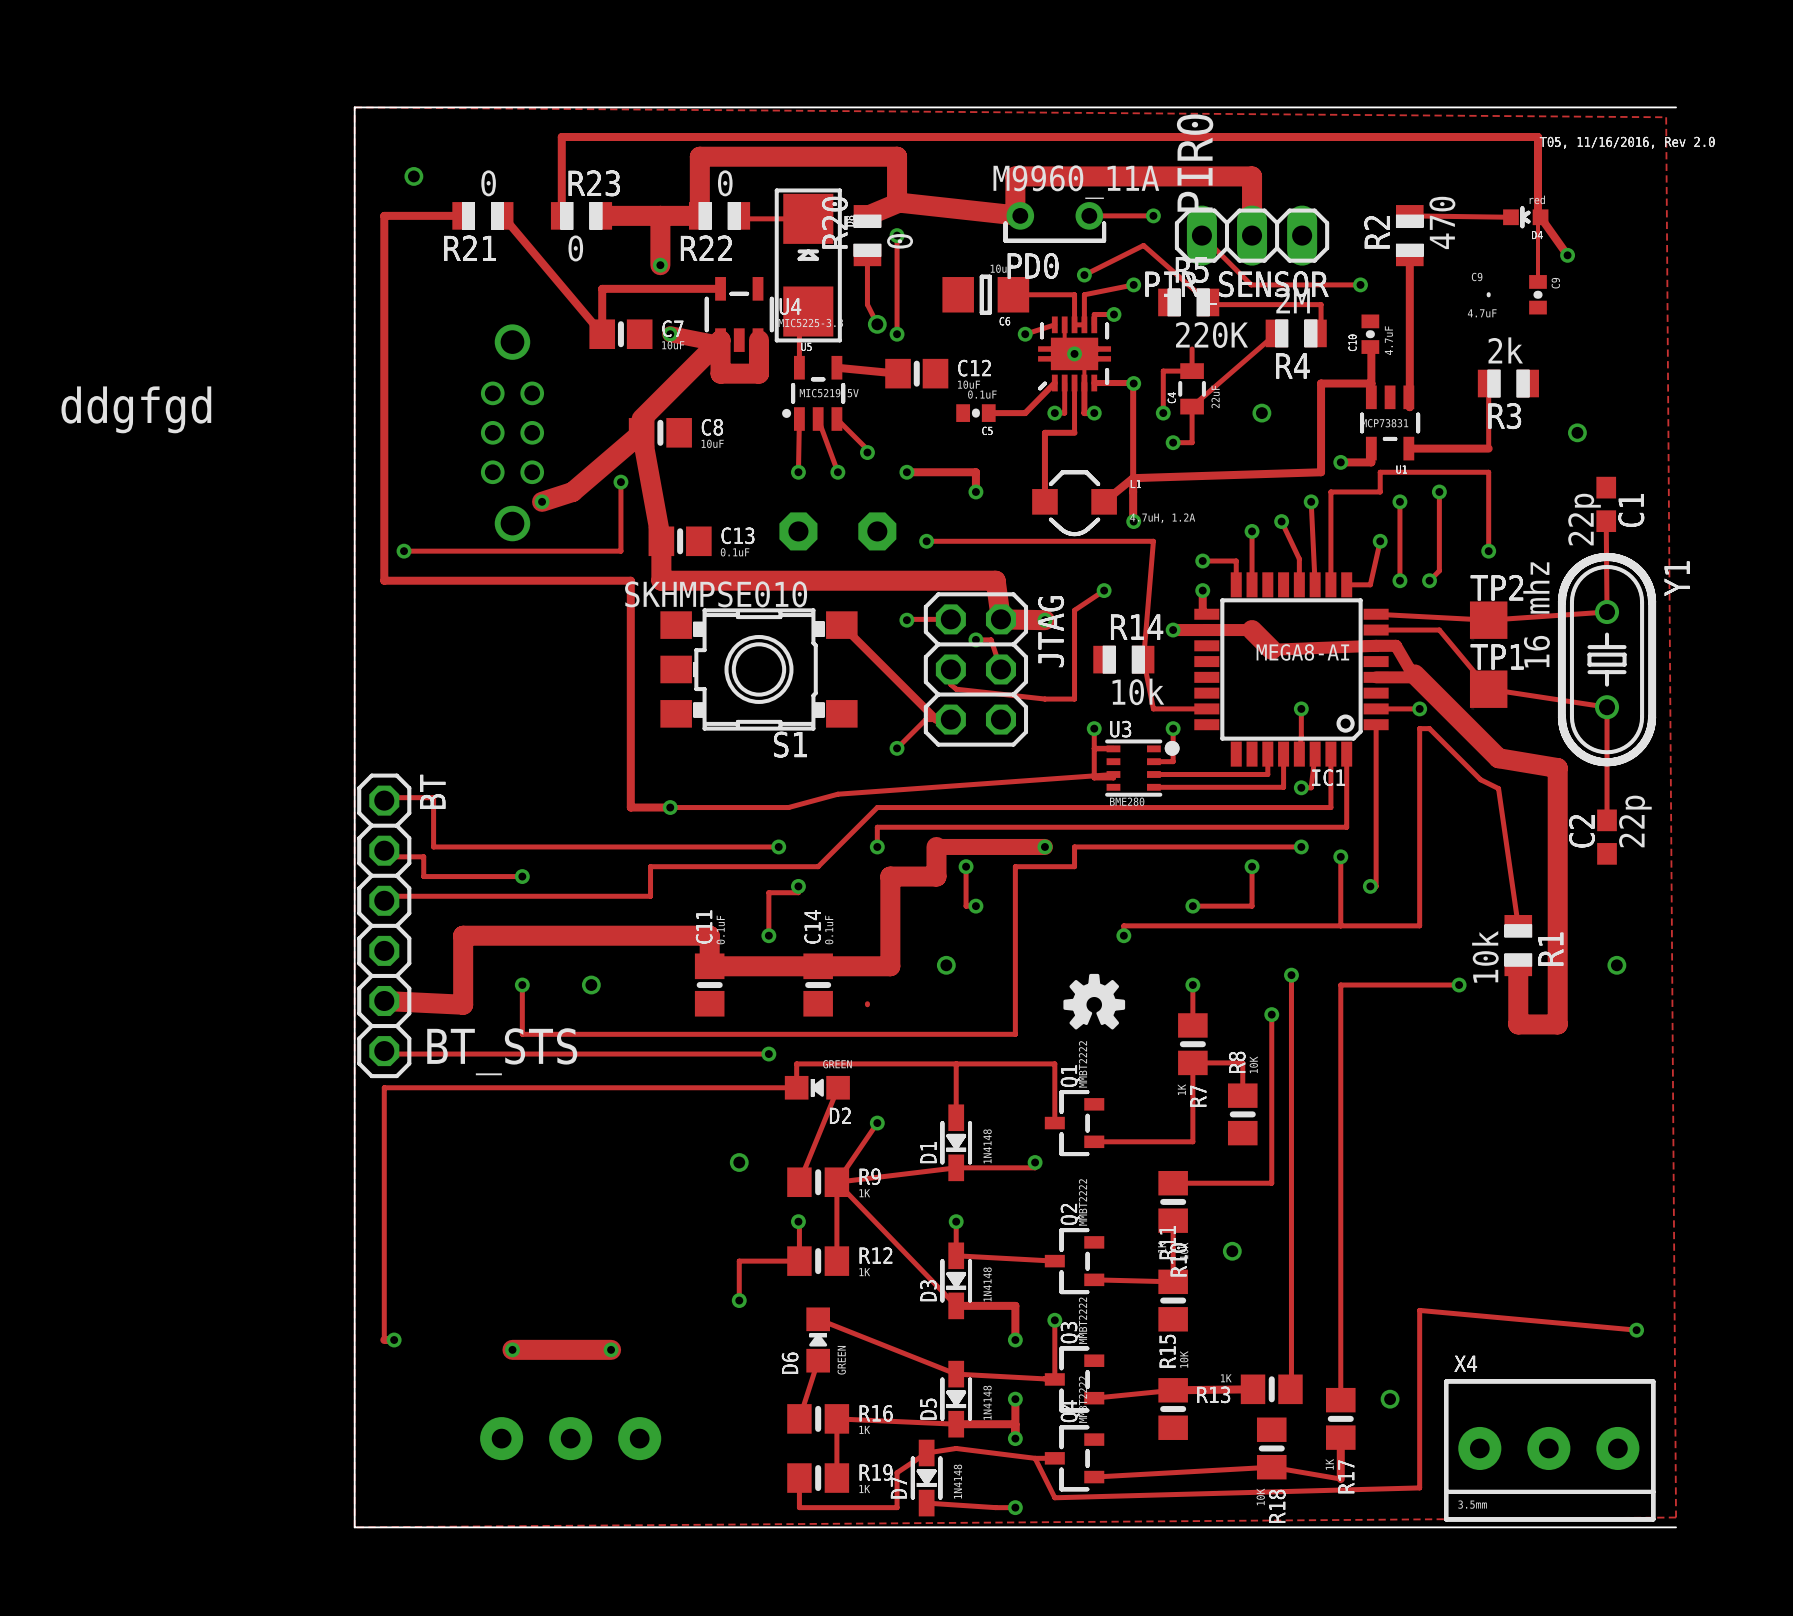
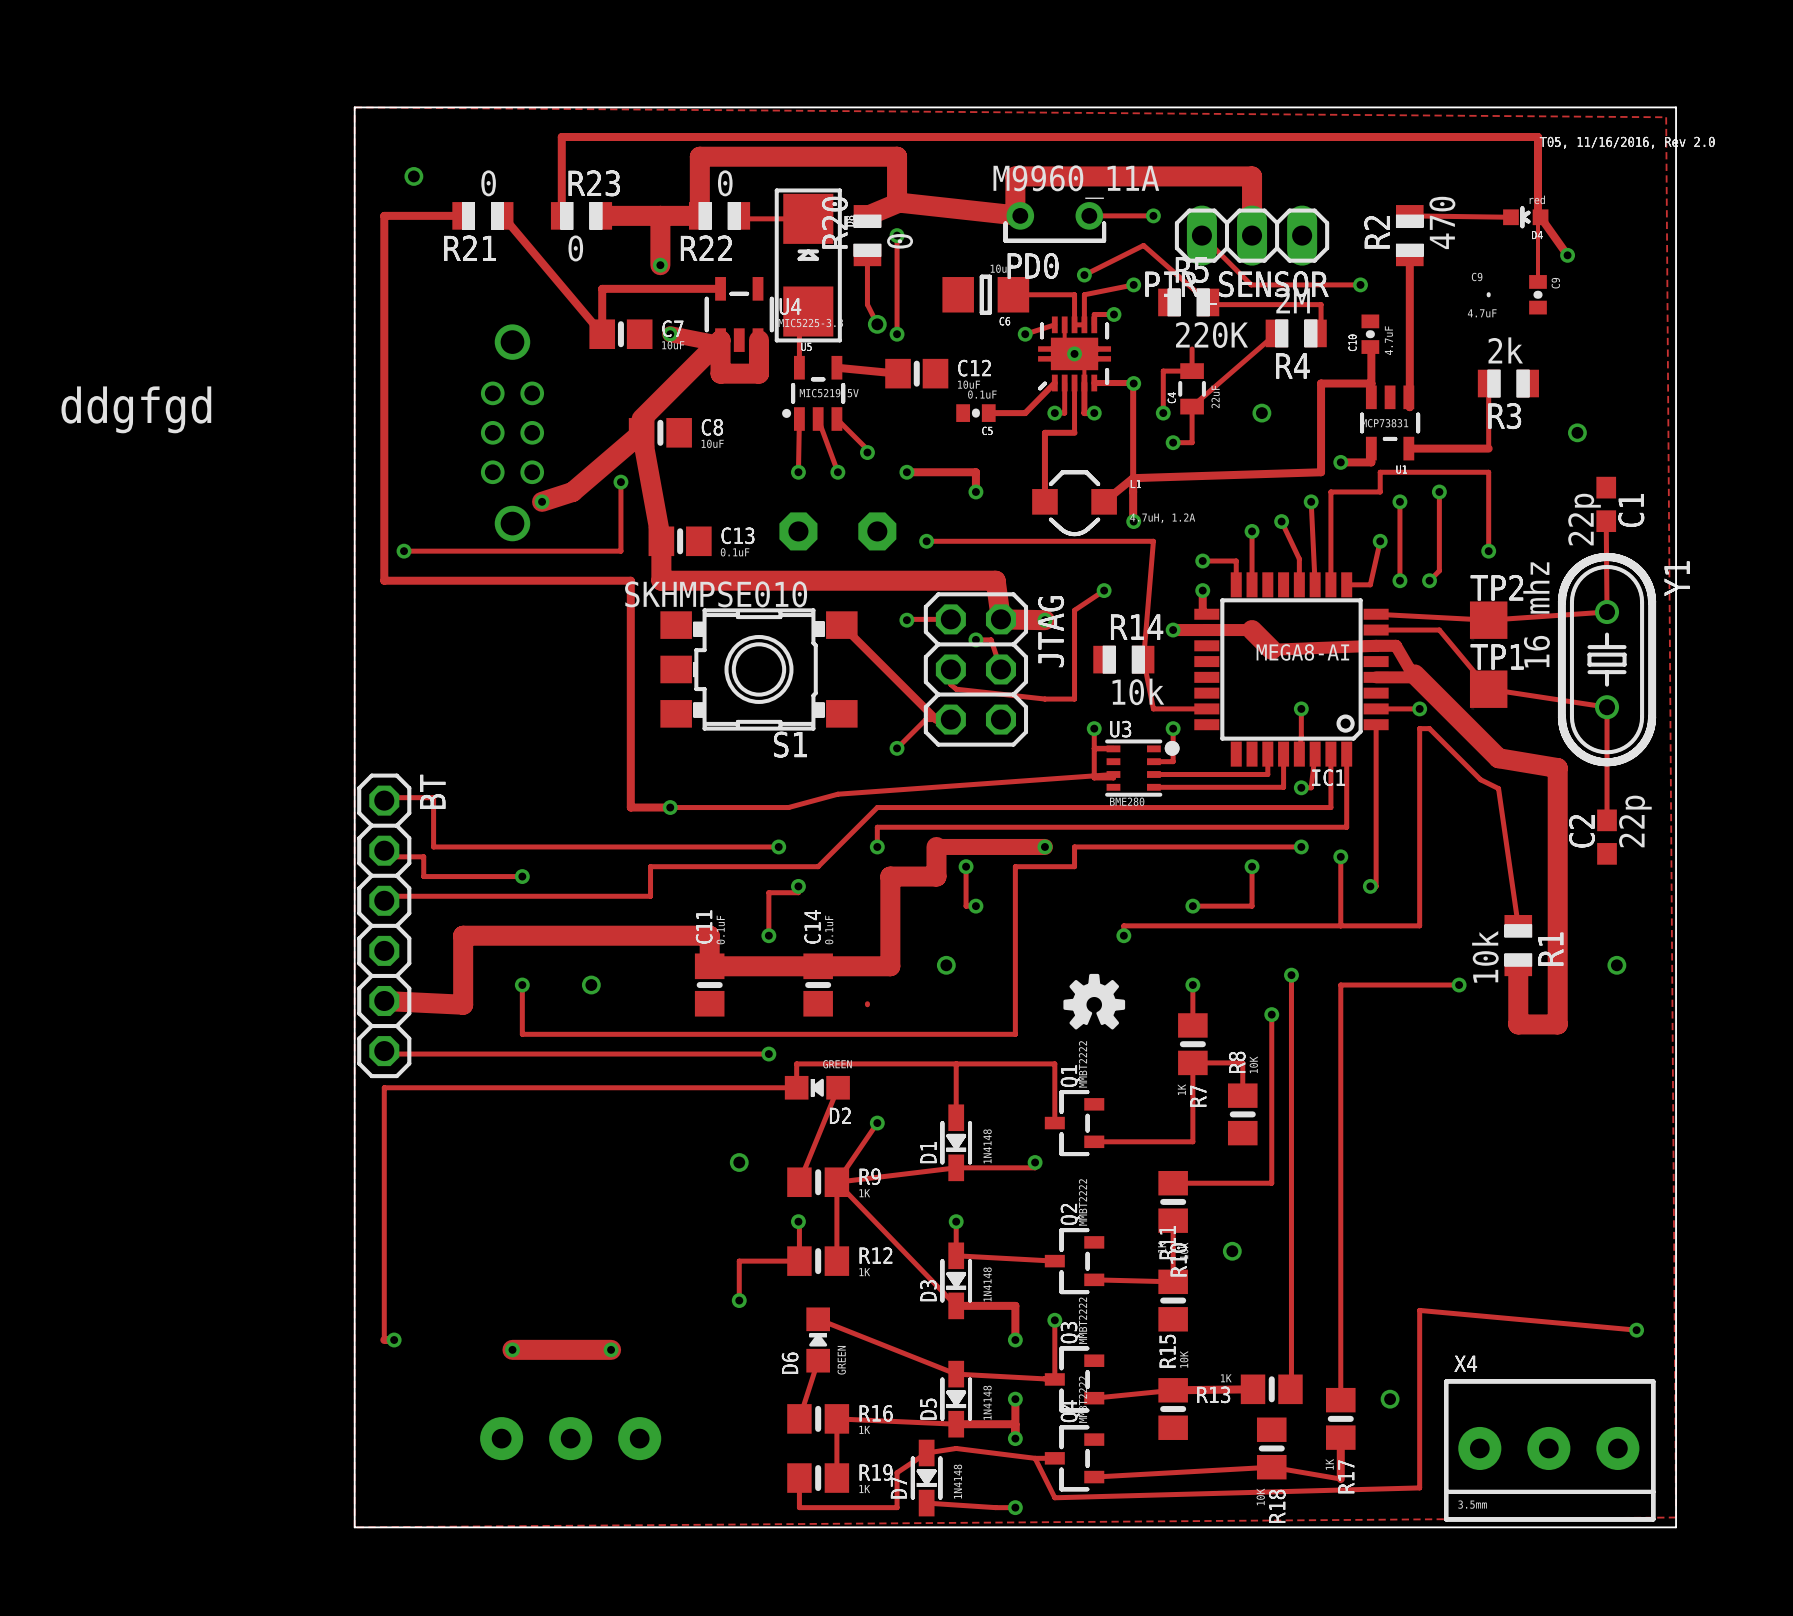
board edge: none -> (1676, 107) (1676, 1527)
text: PIR0 (1195, 163) -> none
text: BT_STS (502, 1051) -> none

